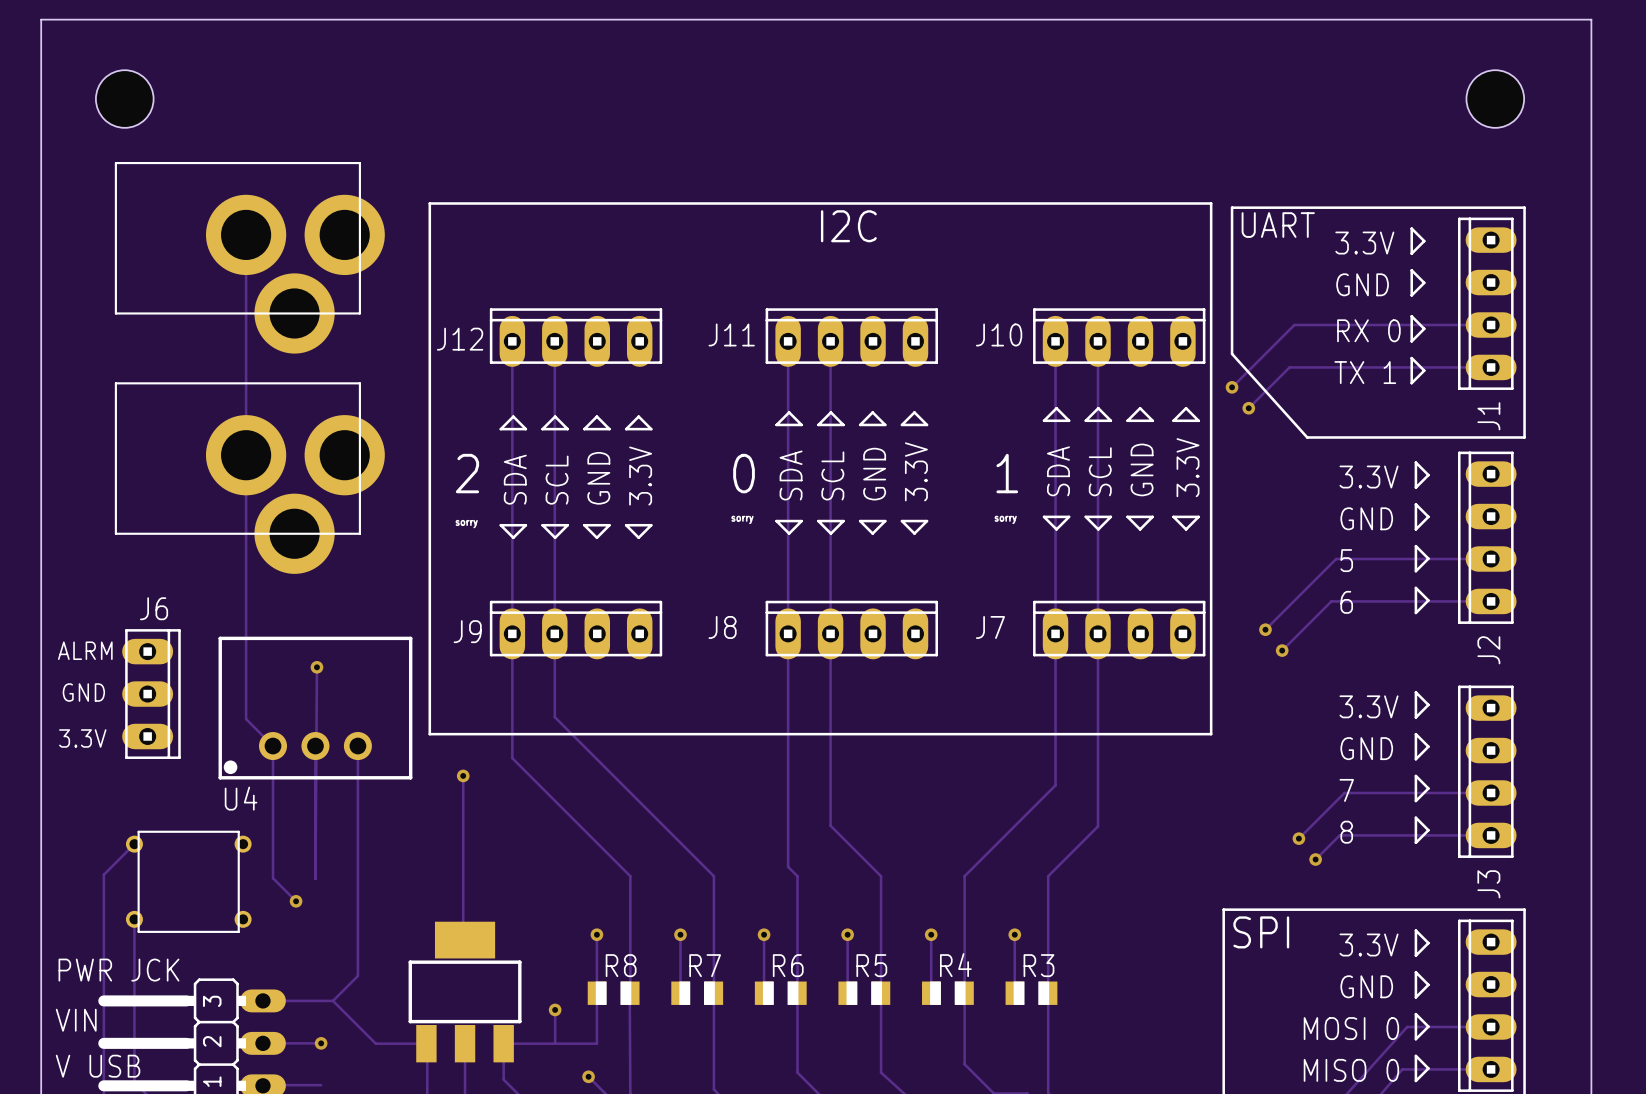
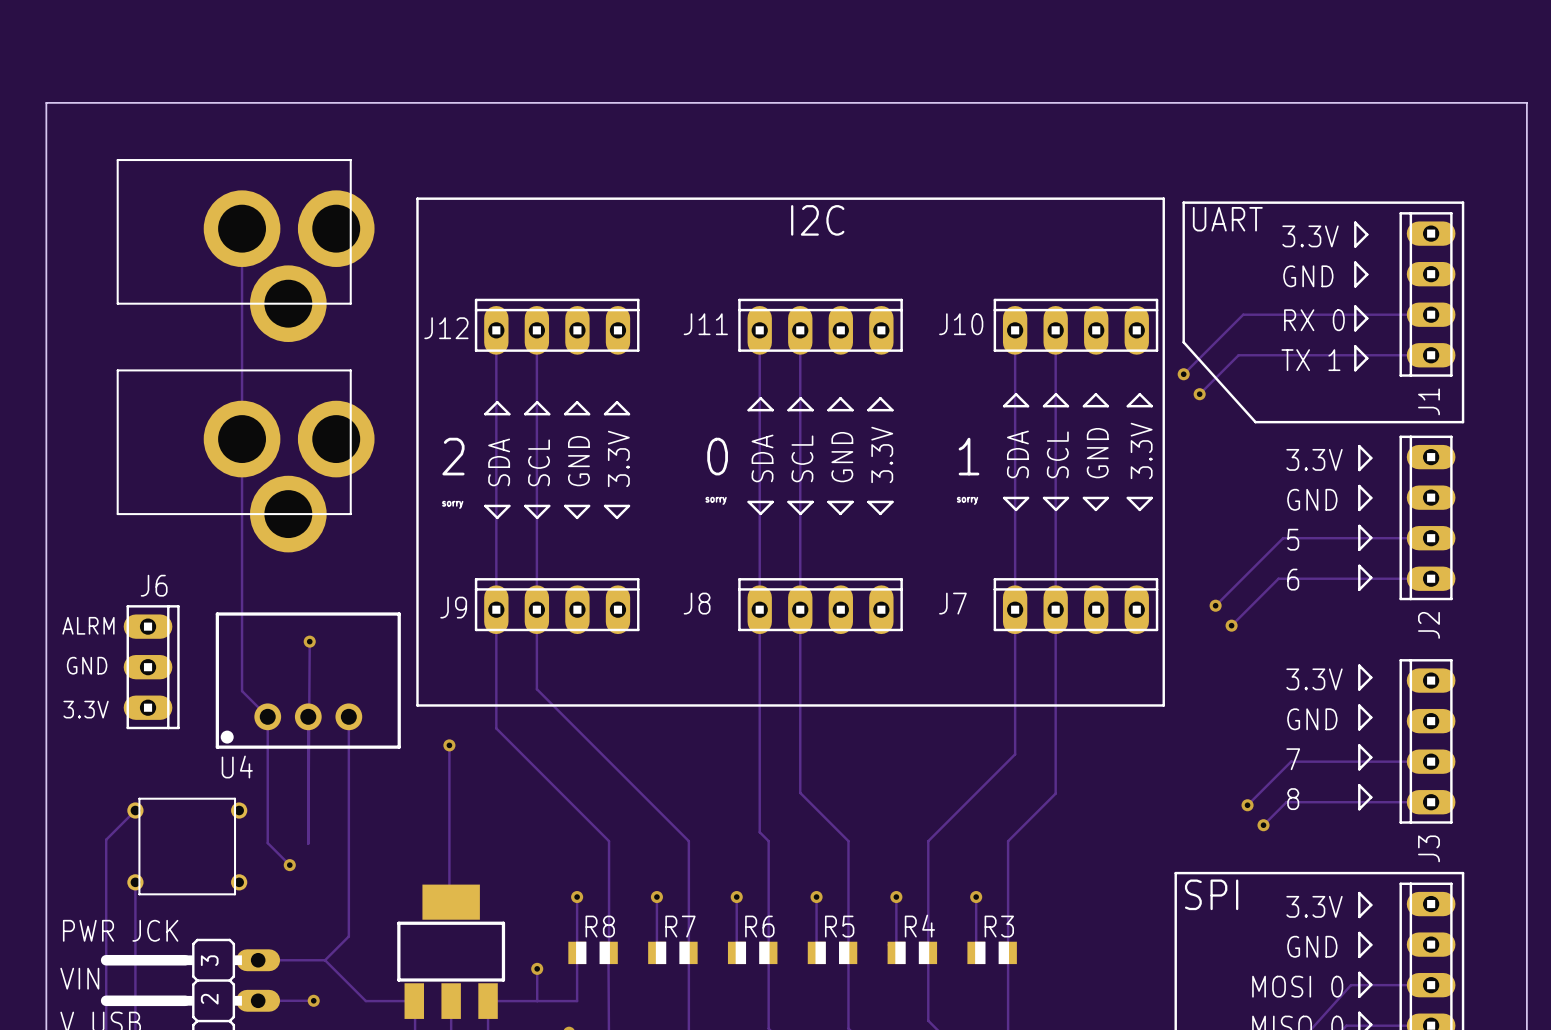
hole: (124, 99) -> none
hole: (1495, 99) -> none
board edge: (41, 103) (41, 19) (1591, 19) (1591, 103) -> (46, 102) (1526, 102)

